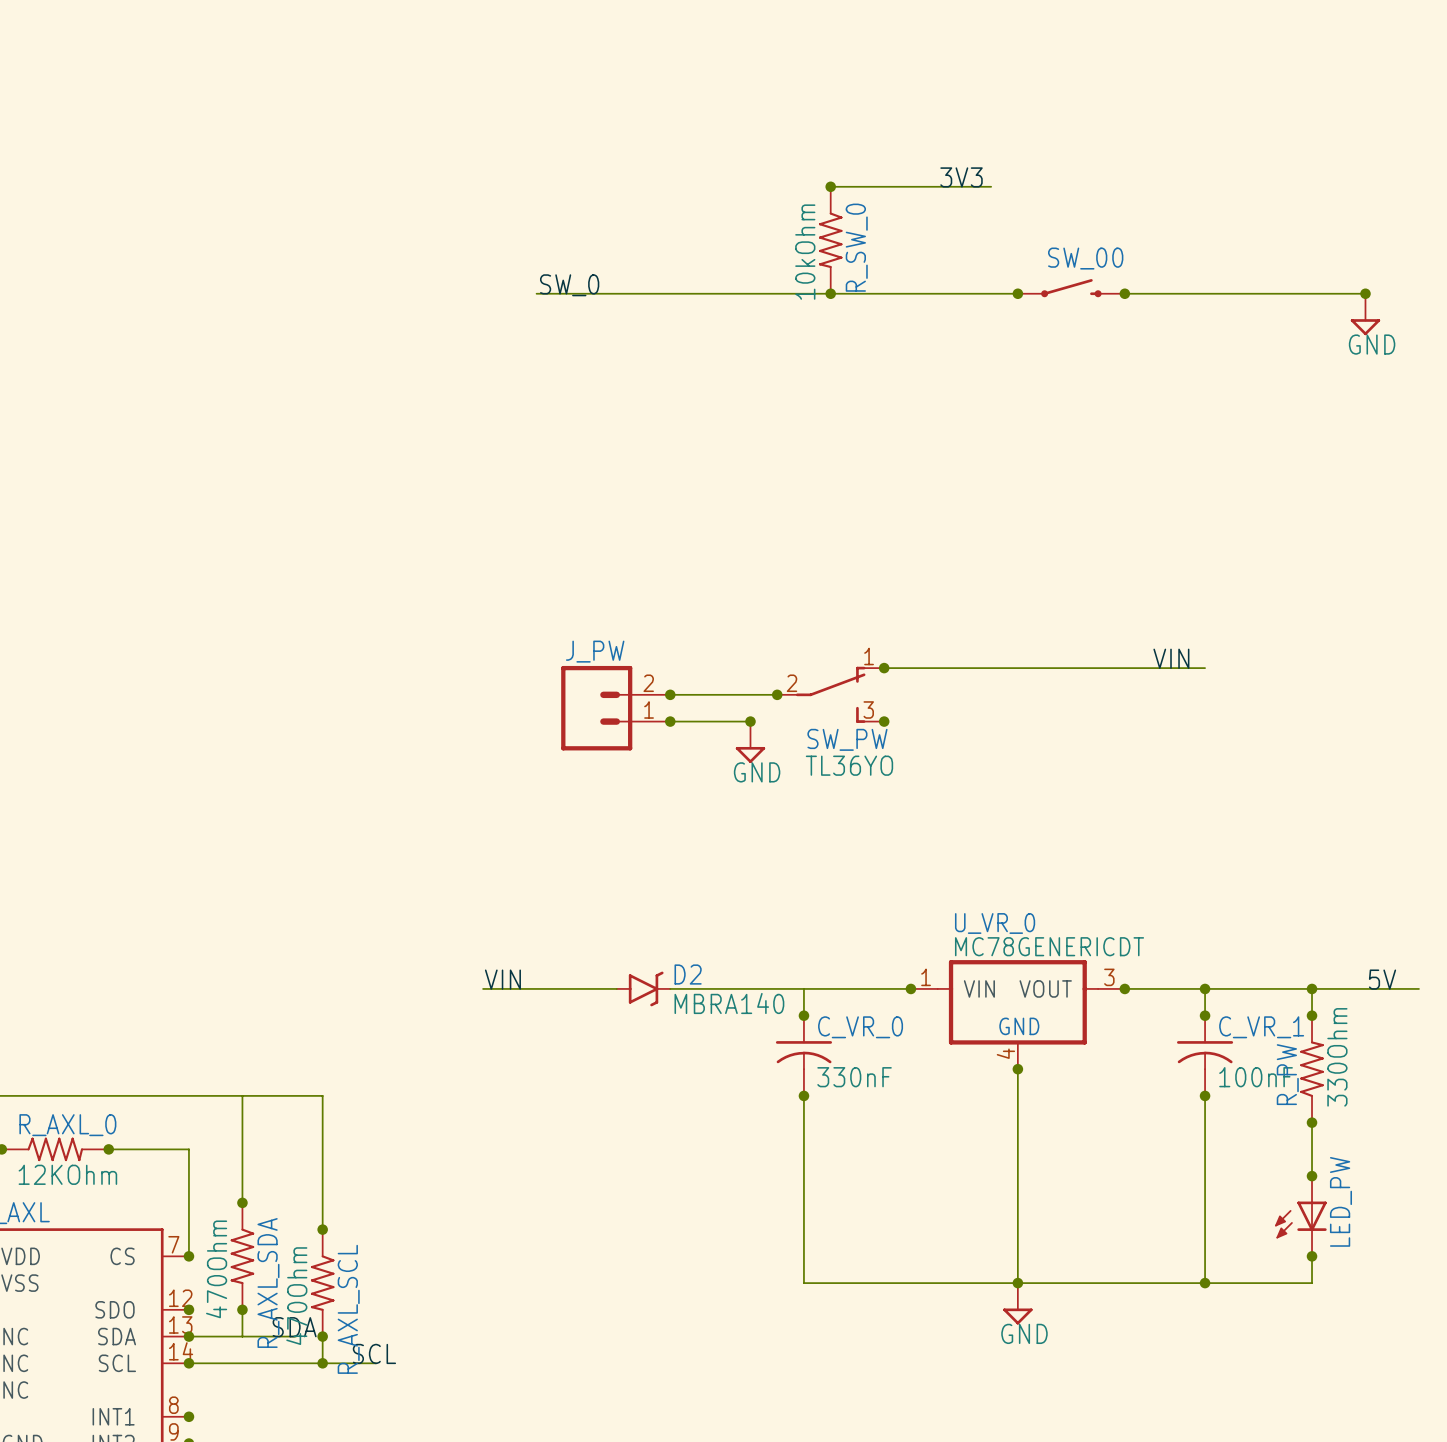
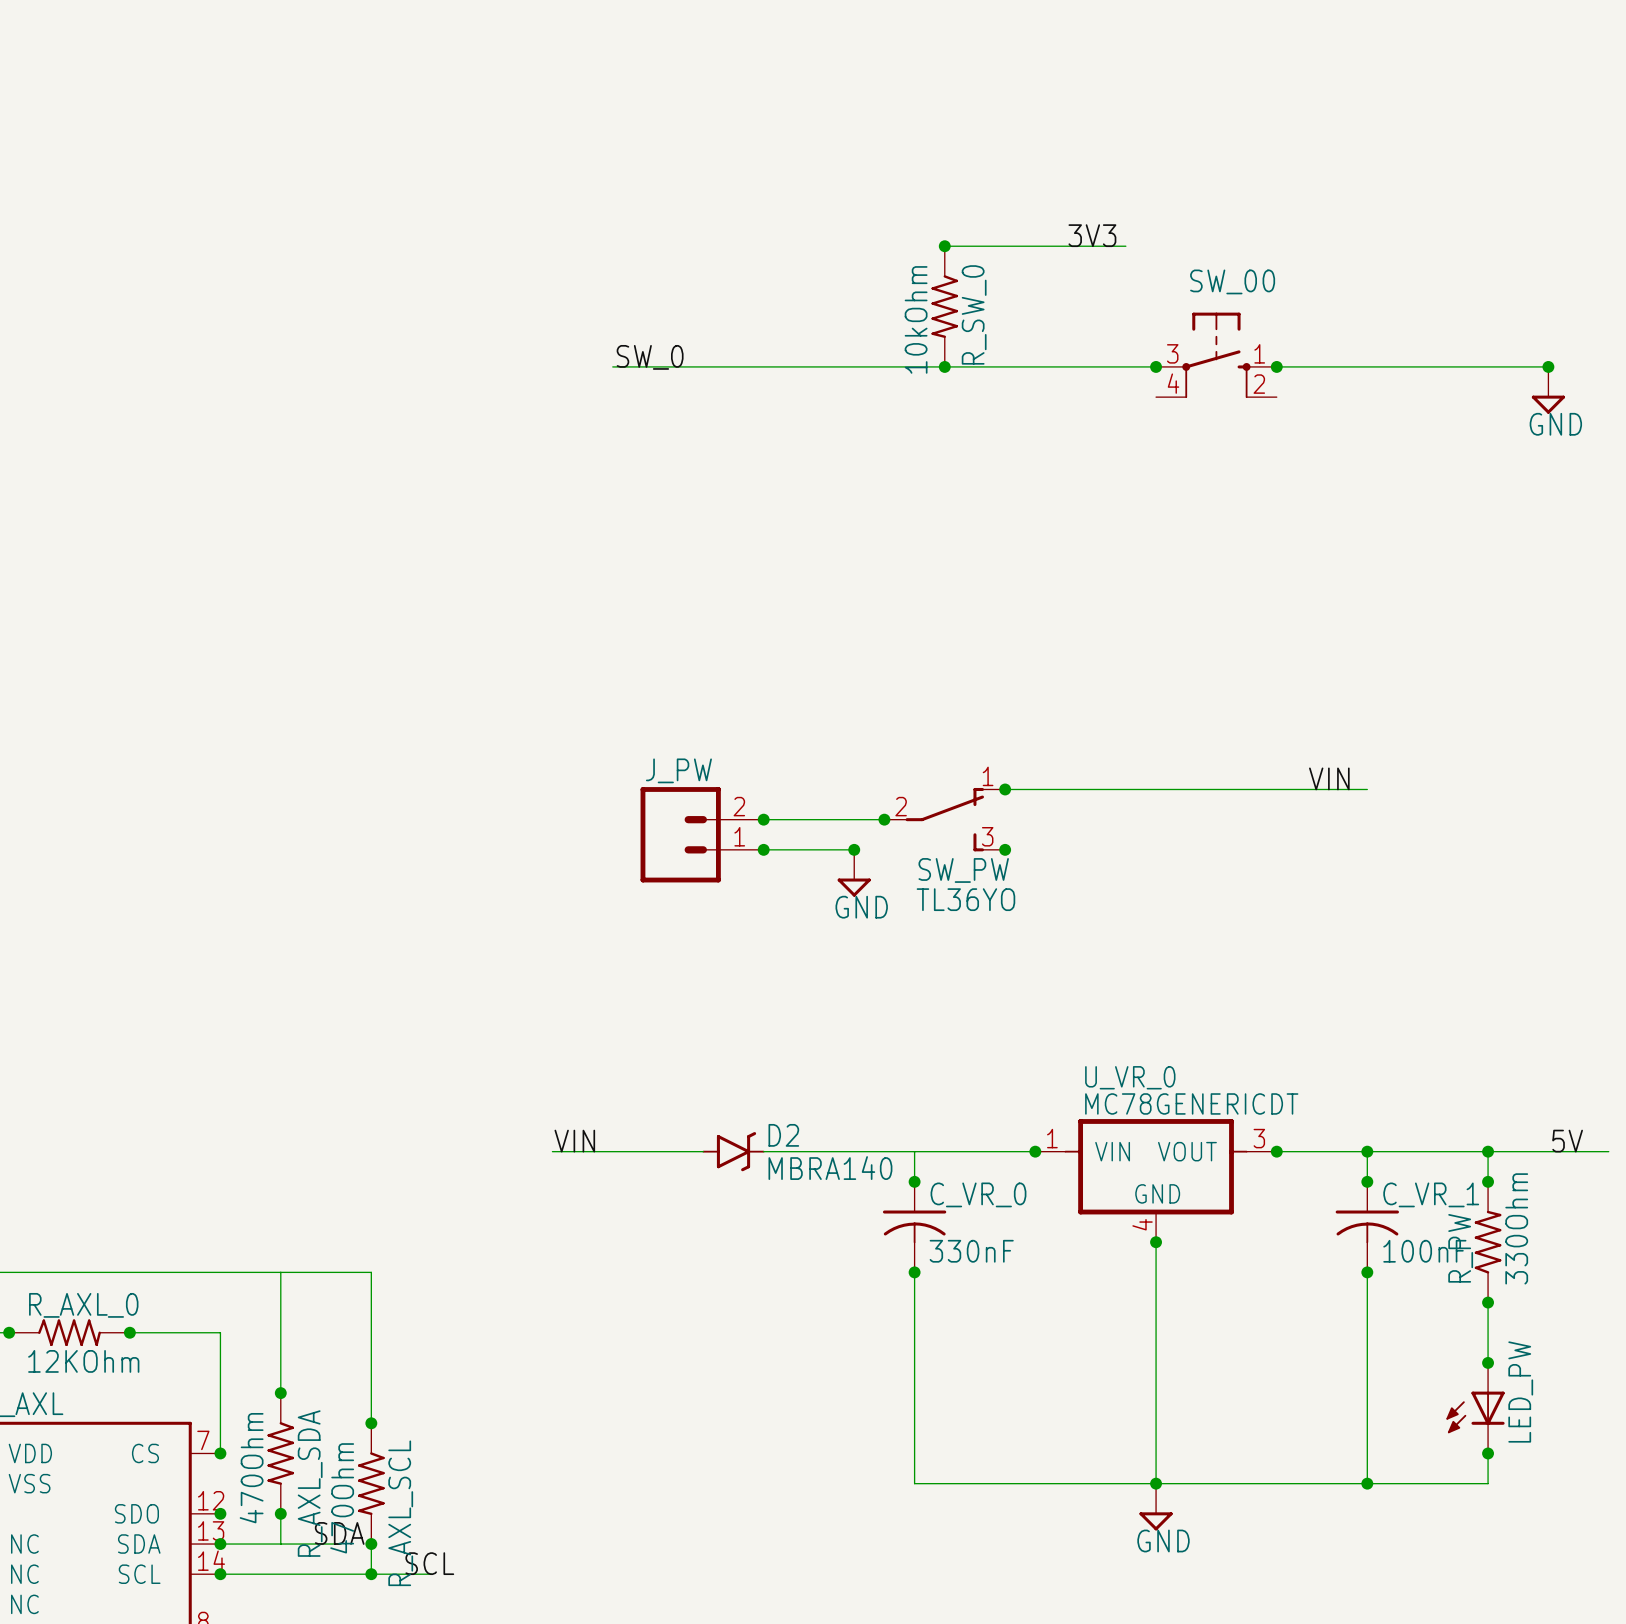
SW_00 name position: SW_00 (1085, 258) -> SW_00 (1232, 281)
SW_00 symbol: [1017, 279, 1125, 298] -> [1156, 312, 1277, 399]

